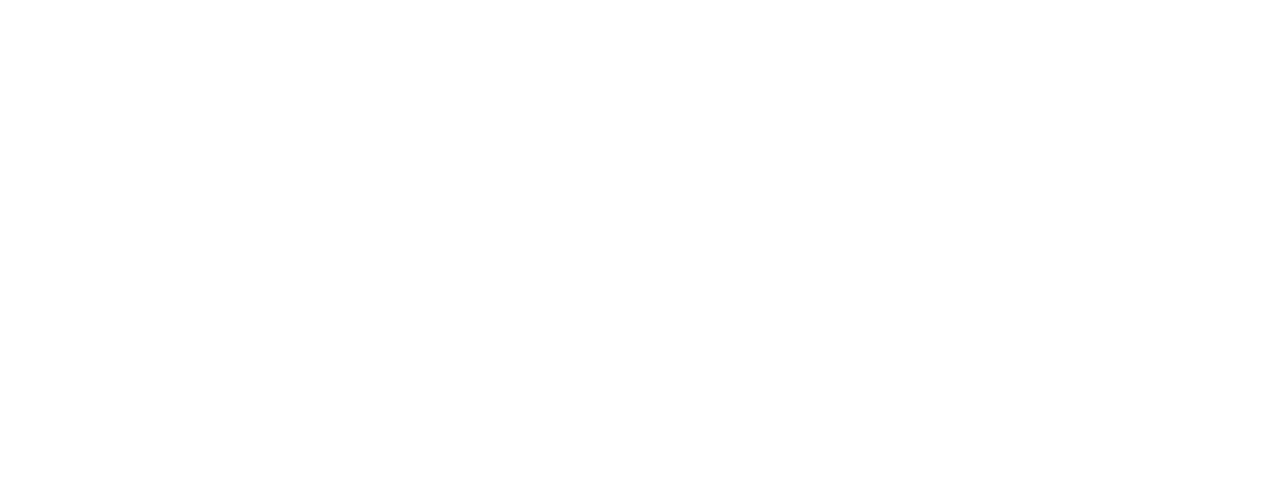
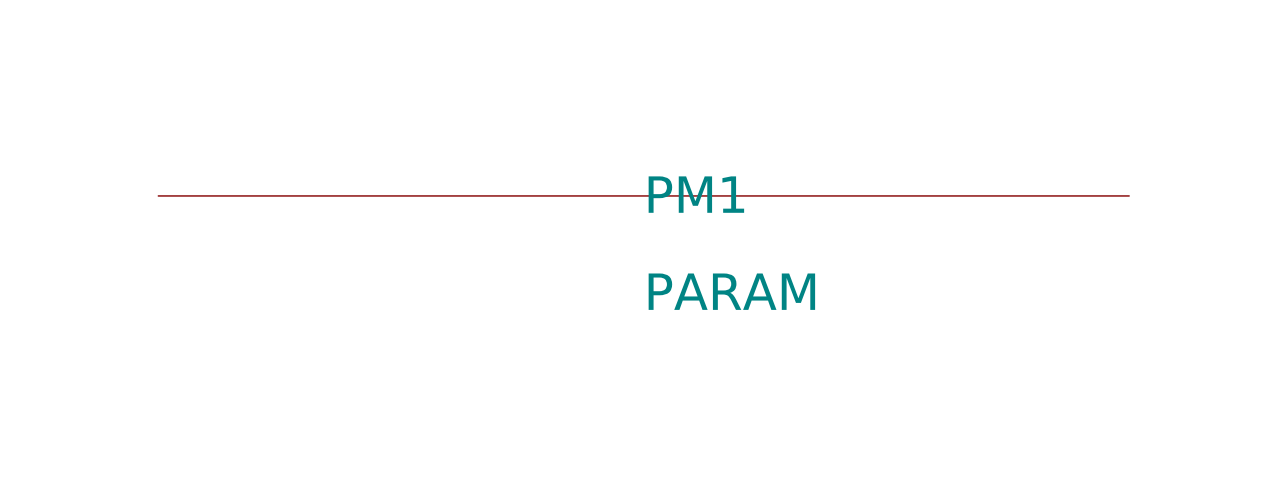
PM1: none -> PARAM (643, 195)

